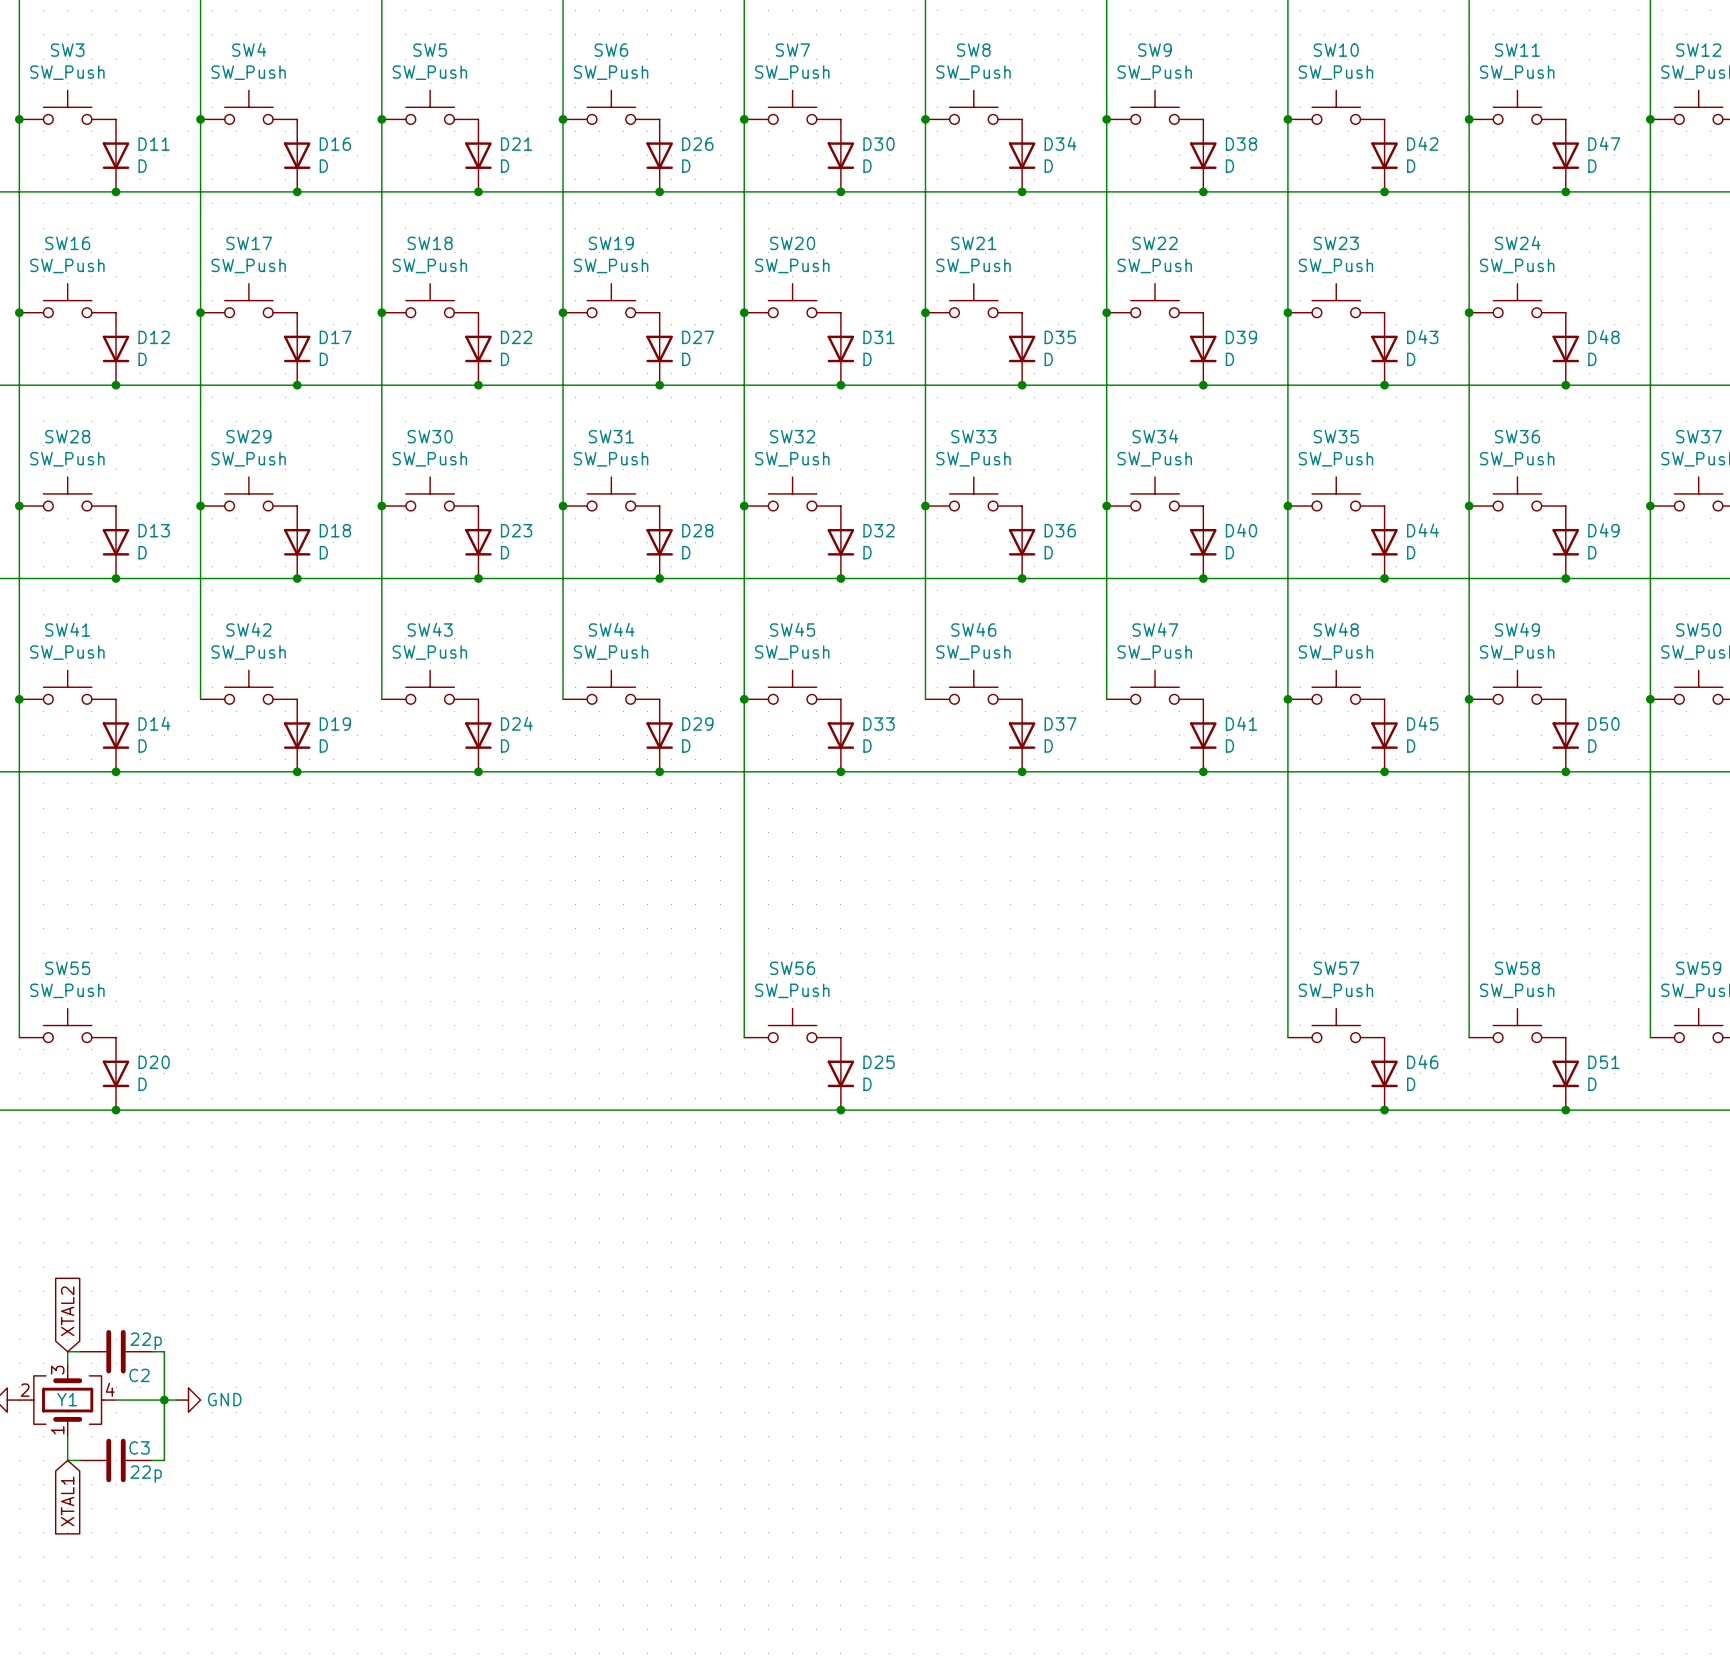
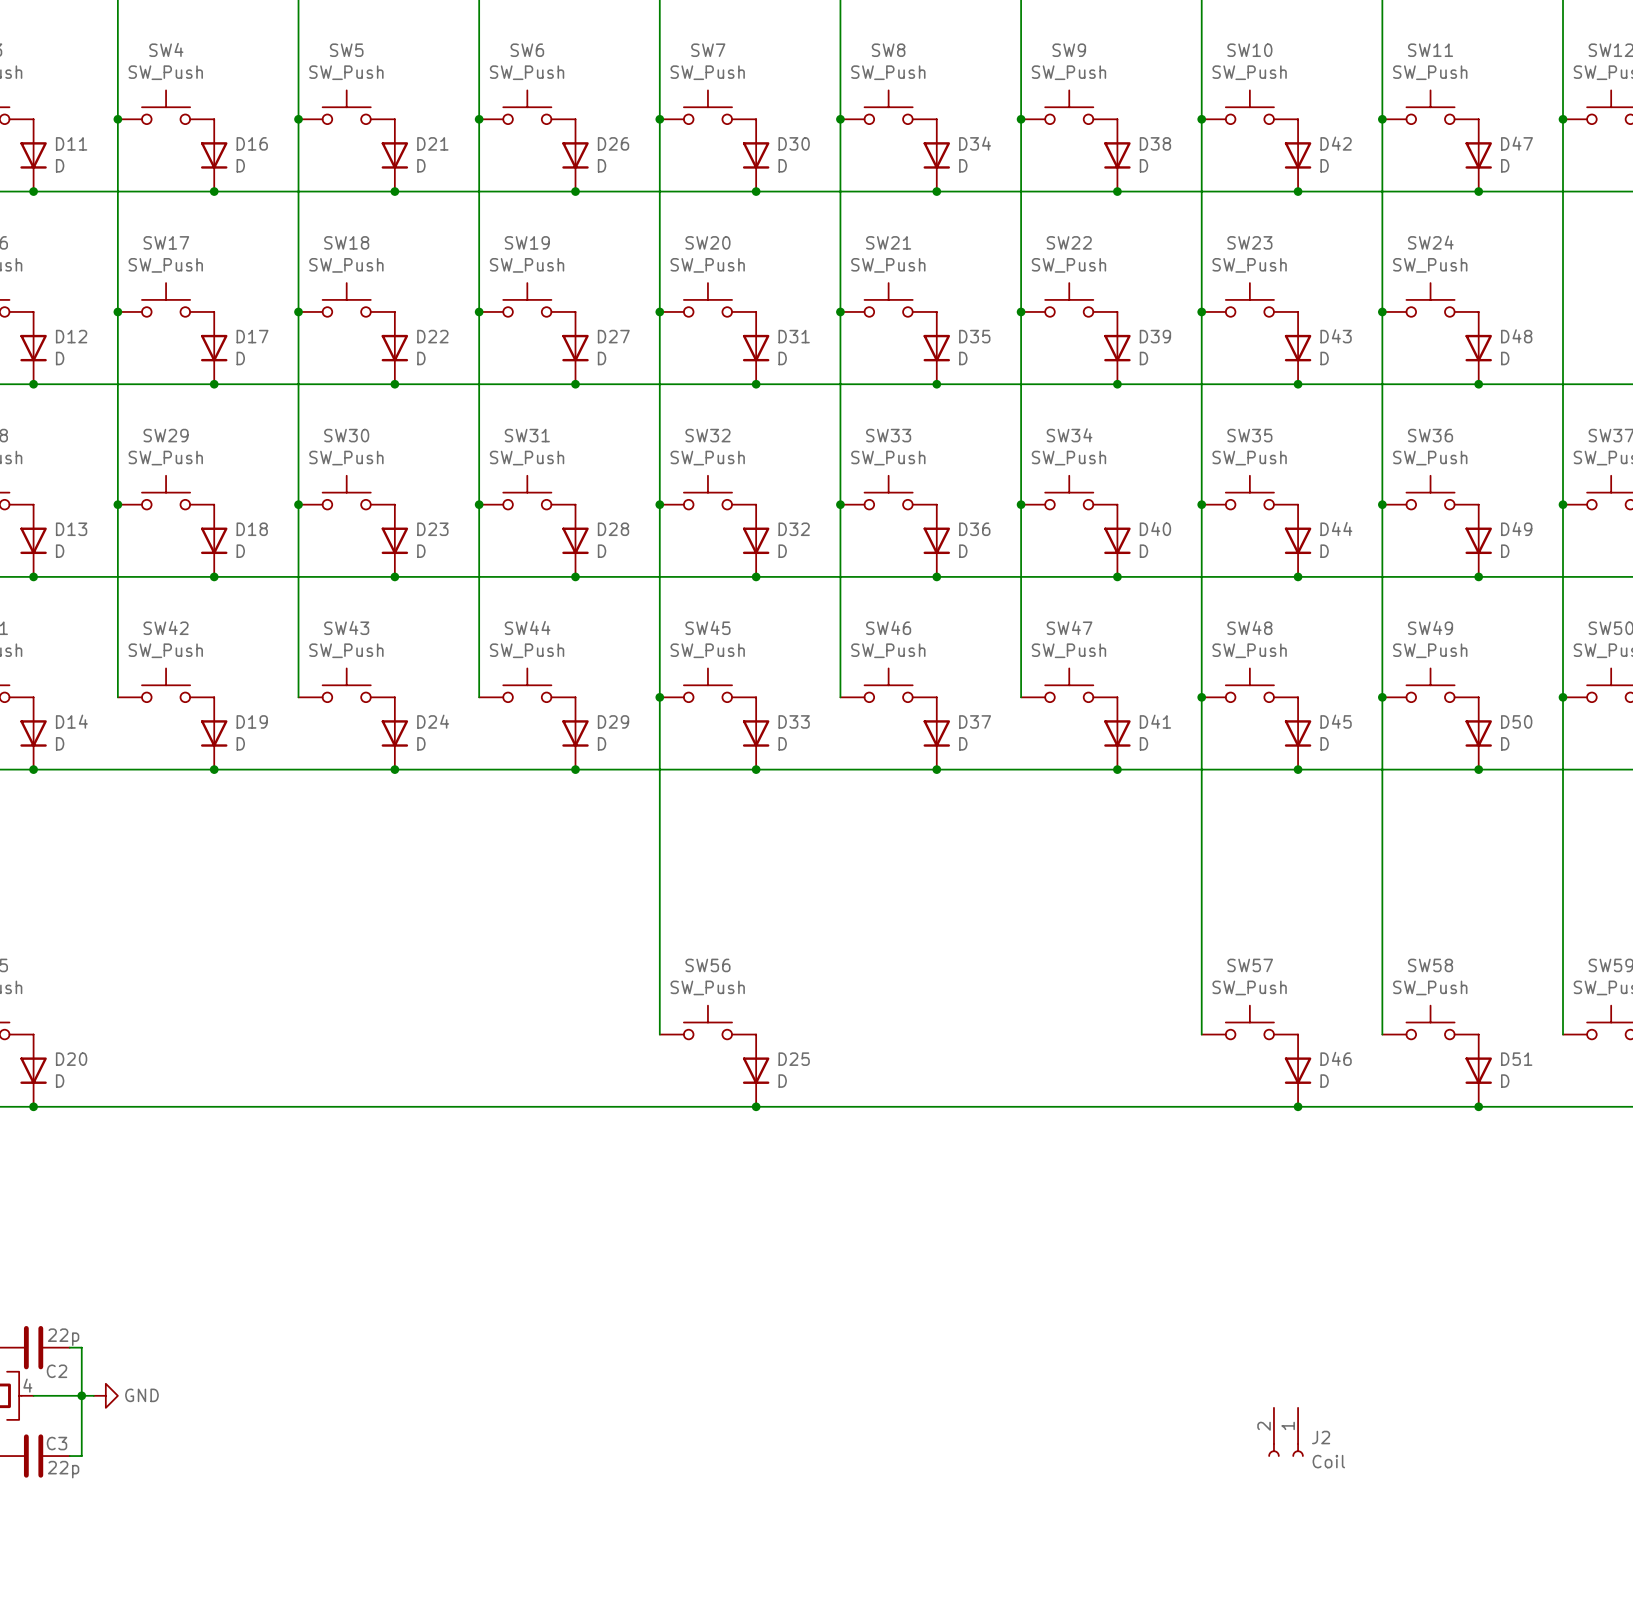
J2: none -> Coil (1286, 1432)

